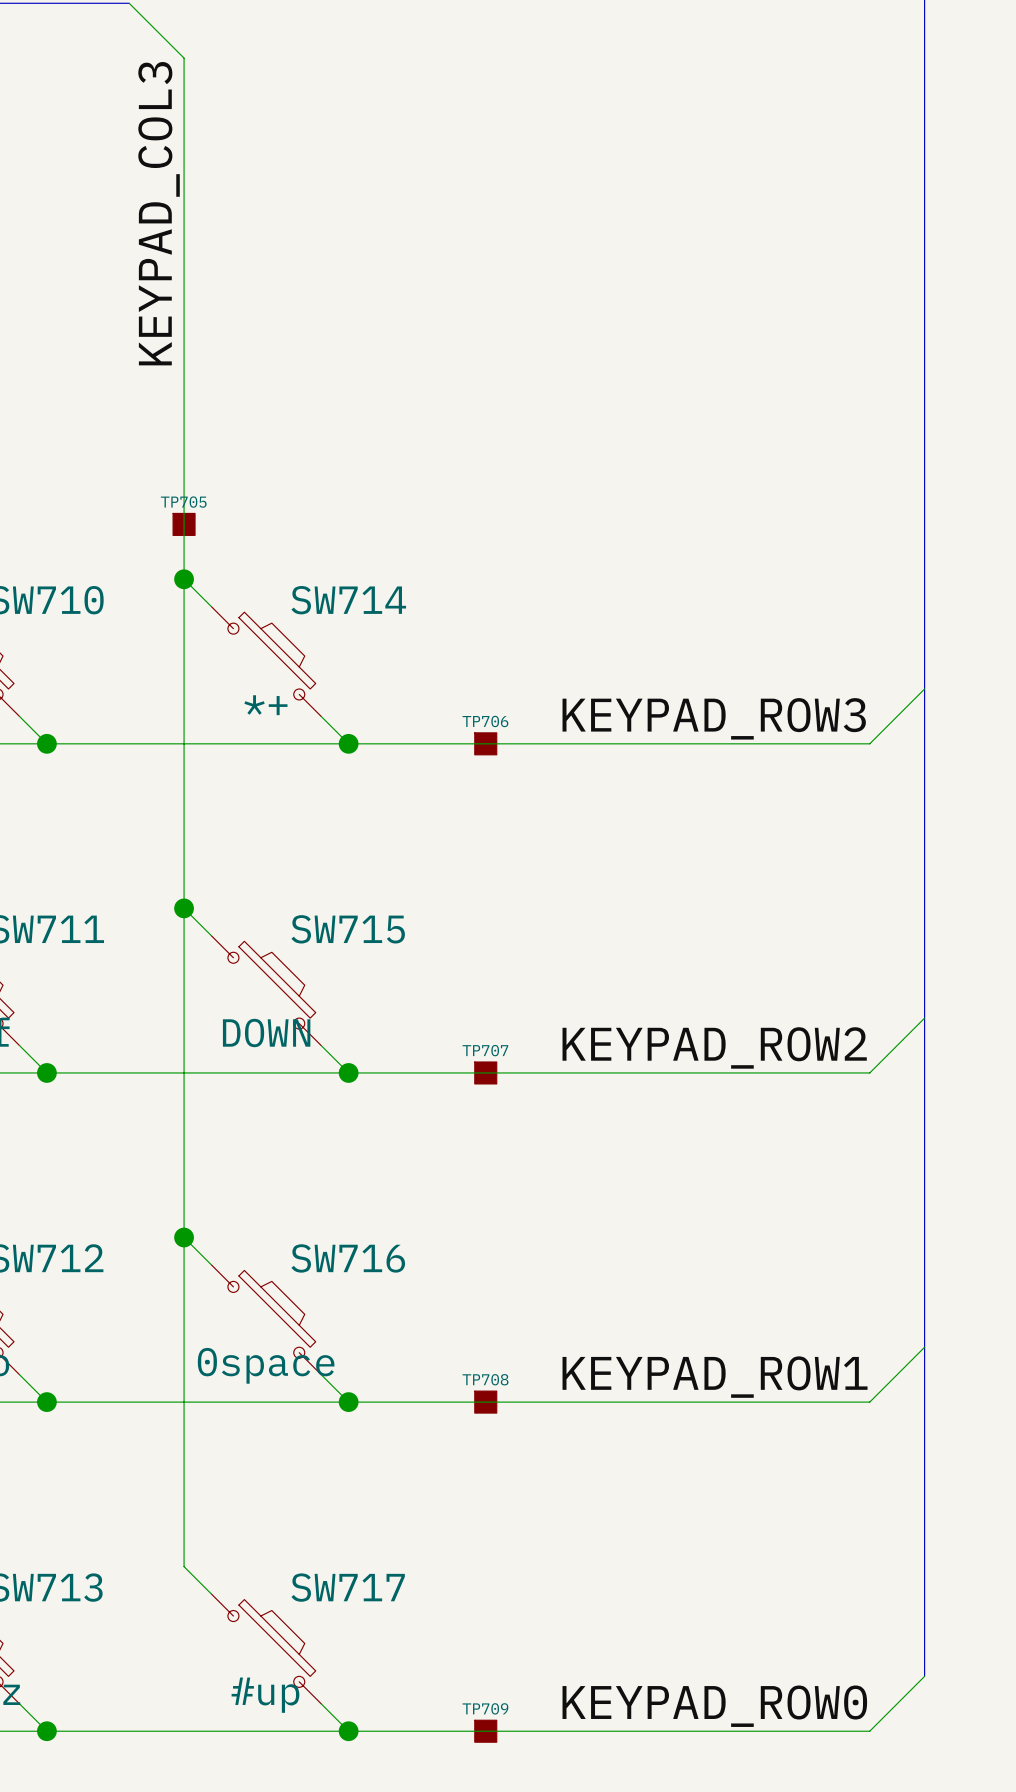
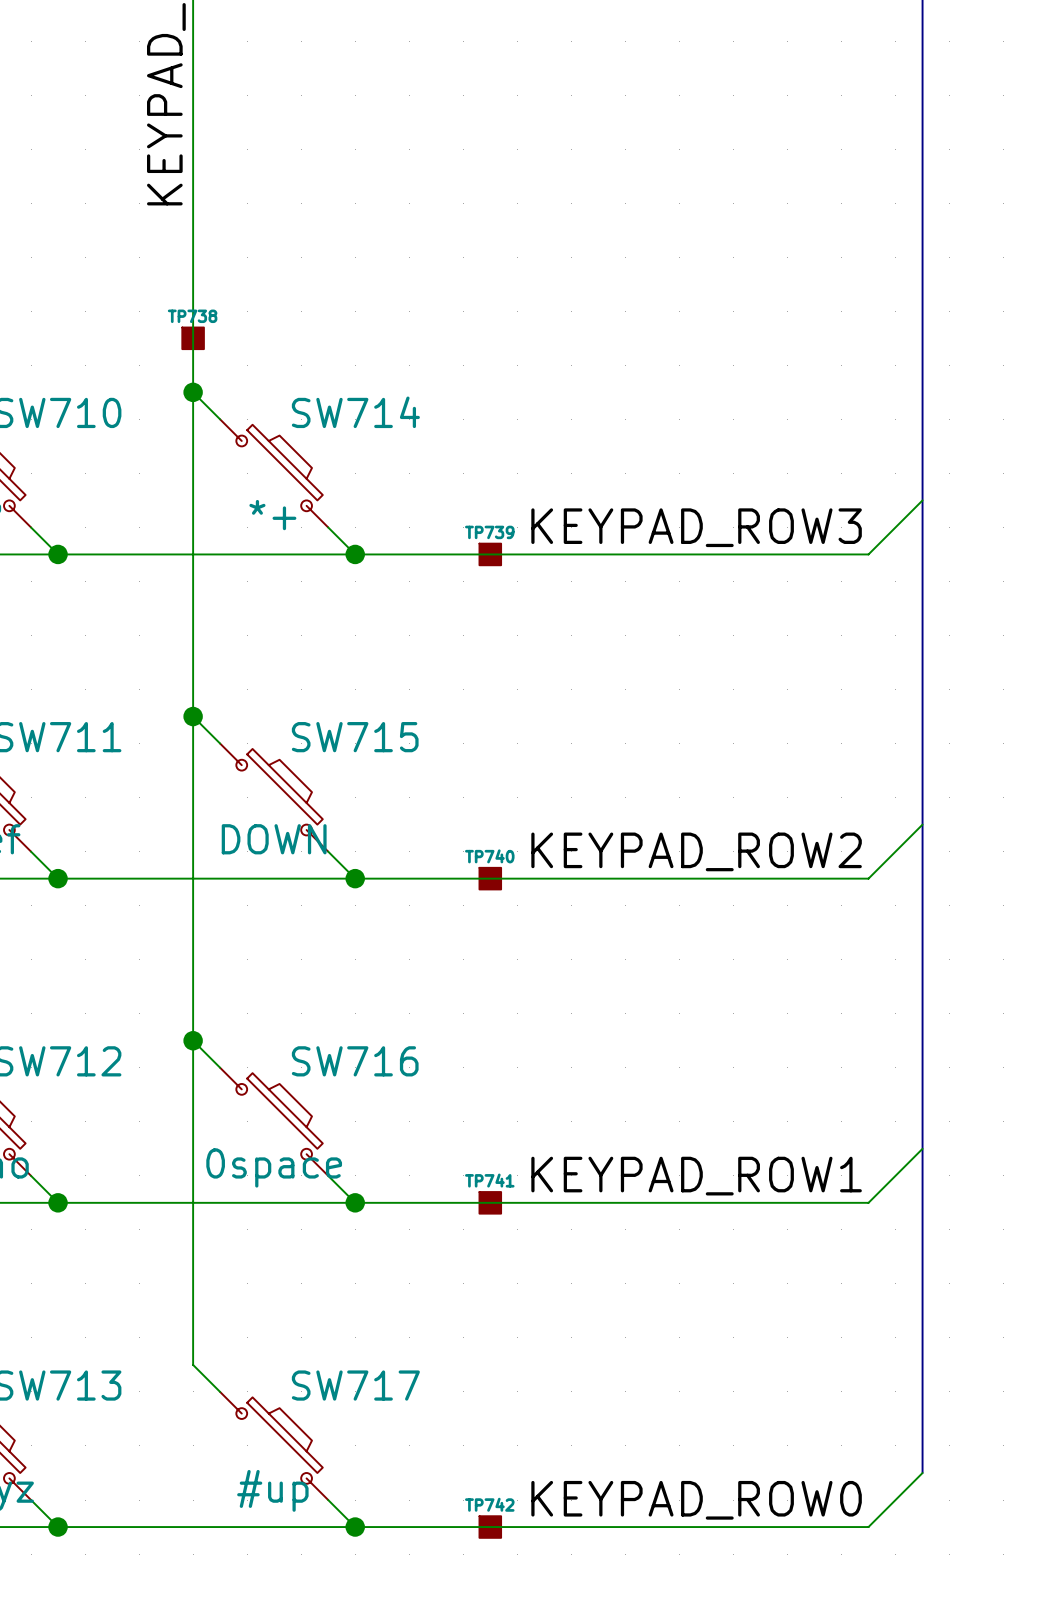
TP705 name: TP705 (183, 502) -> TP738 (192, 316)
TP706 name: TP706 (485, 721) -> TP739 (489, 532)
TP707 name: TP707 (485, 1050) -> TP740 (489, 856)
TP708 name: TP708 (485, 1379) -> TP741 (489, 1180)
TP709 name: TP709 (485, 1708) -> TP742 (489, 1504)

